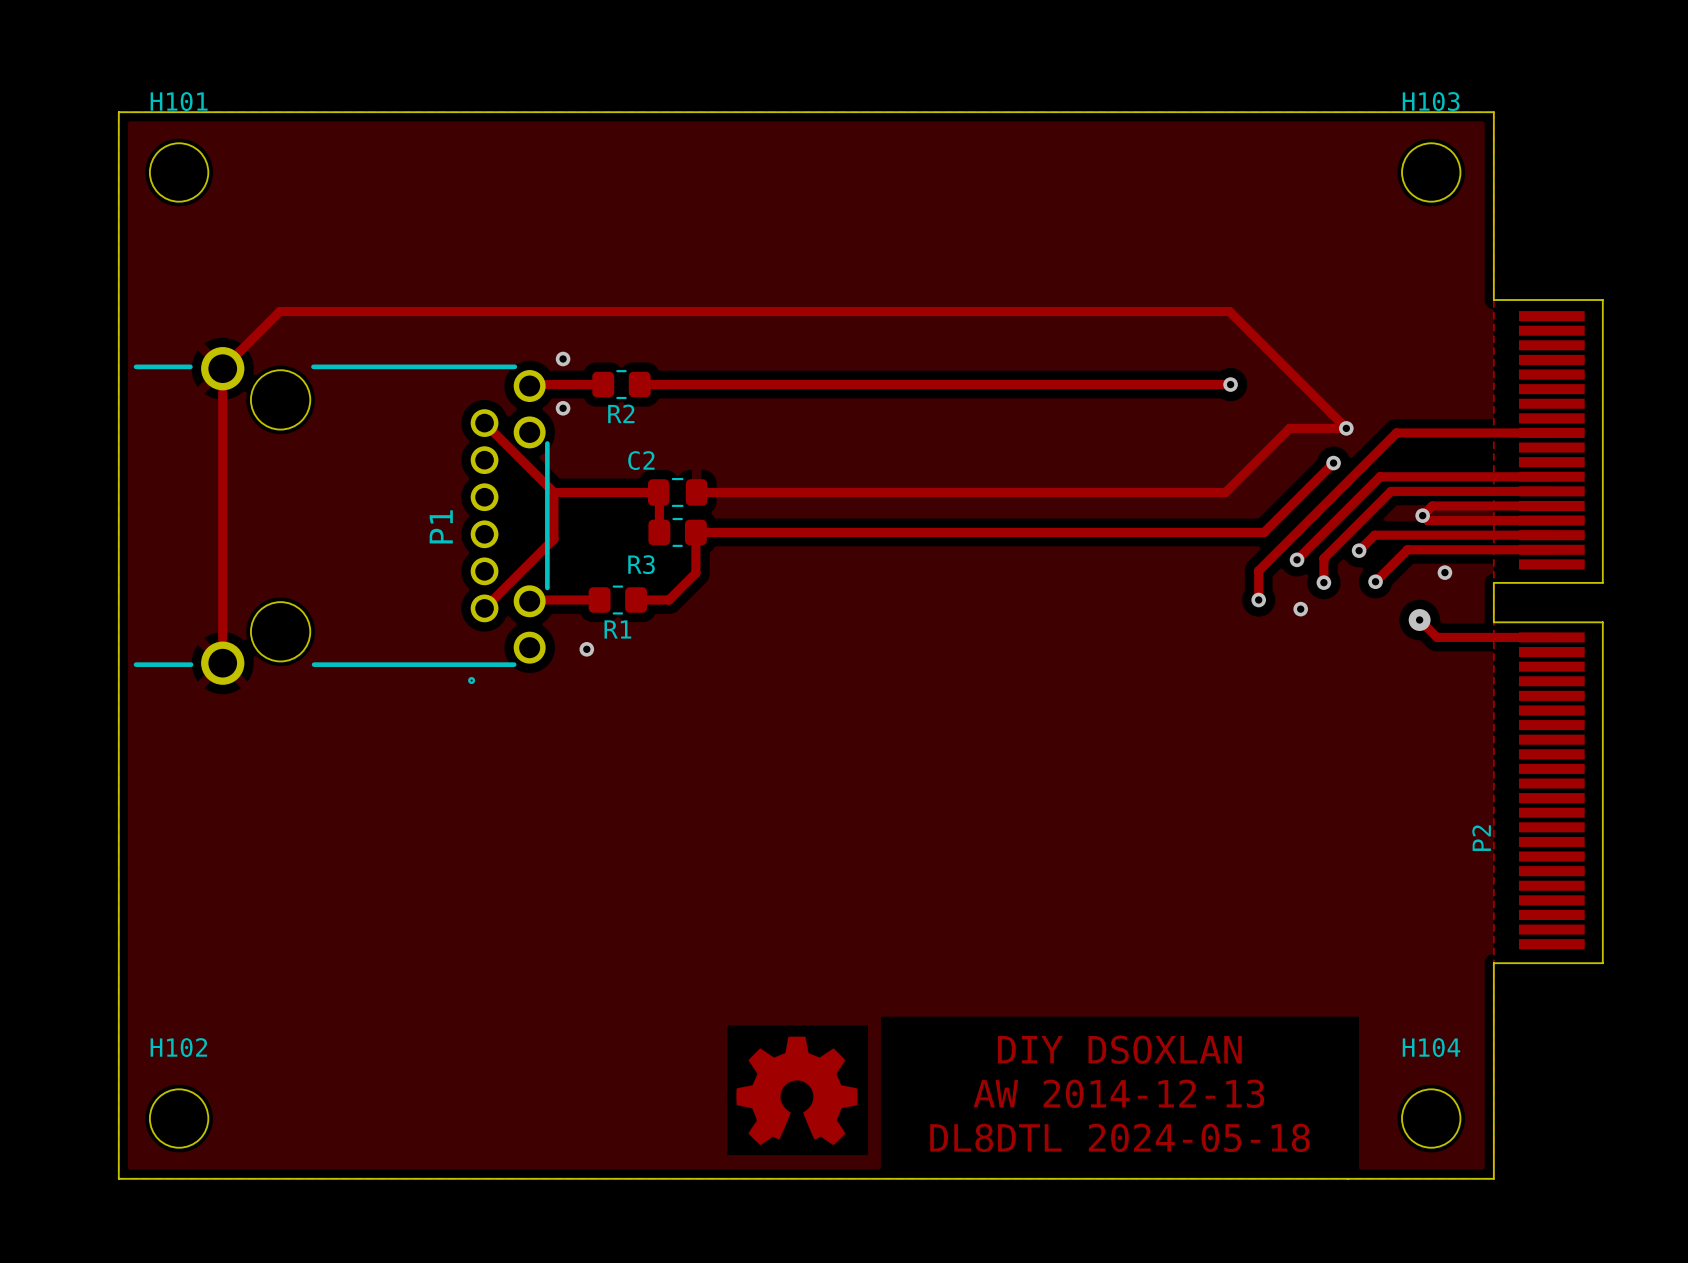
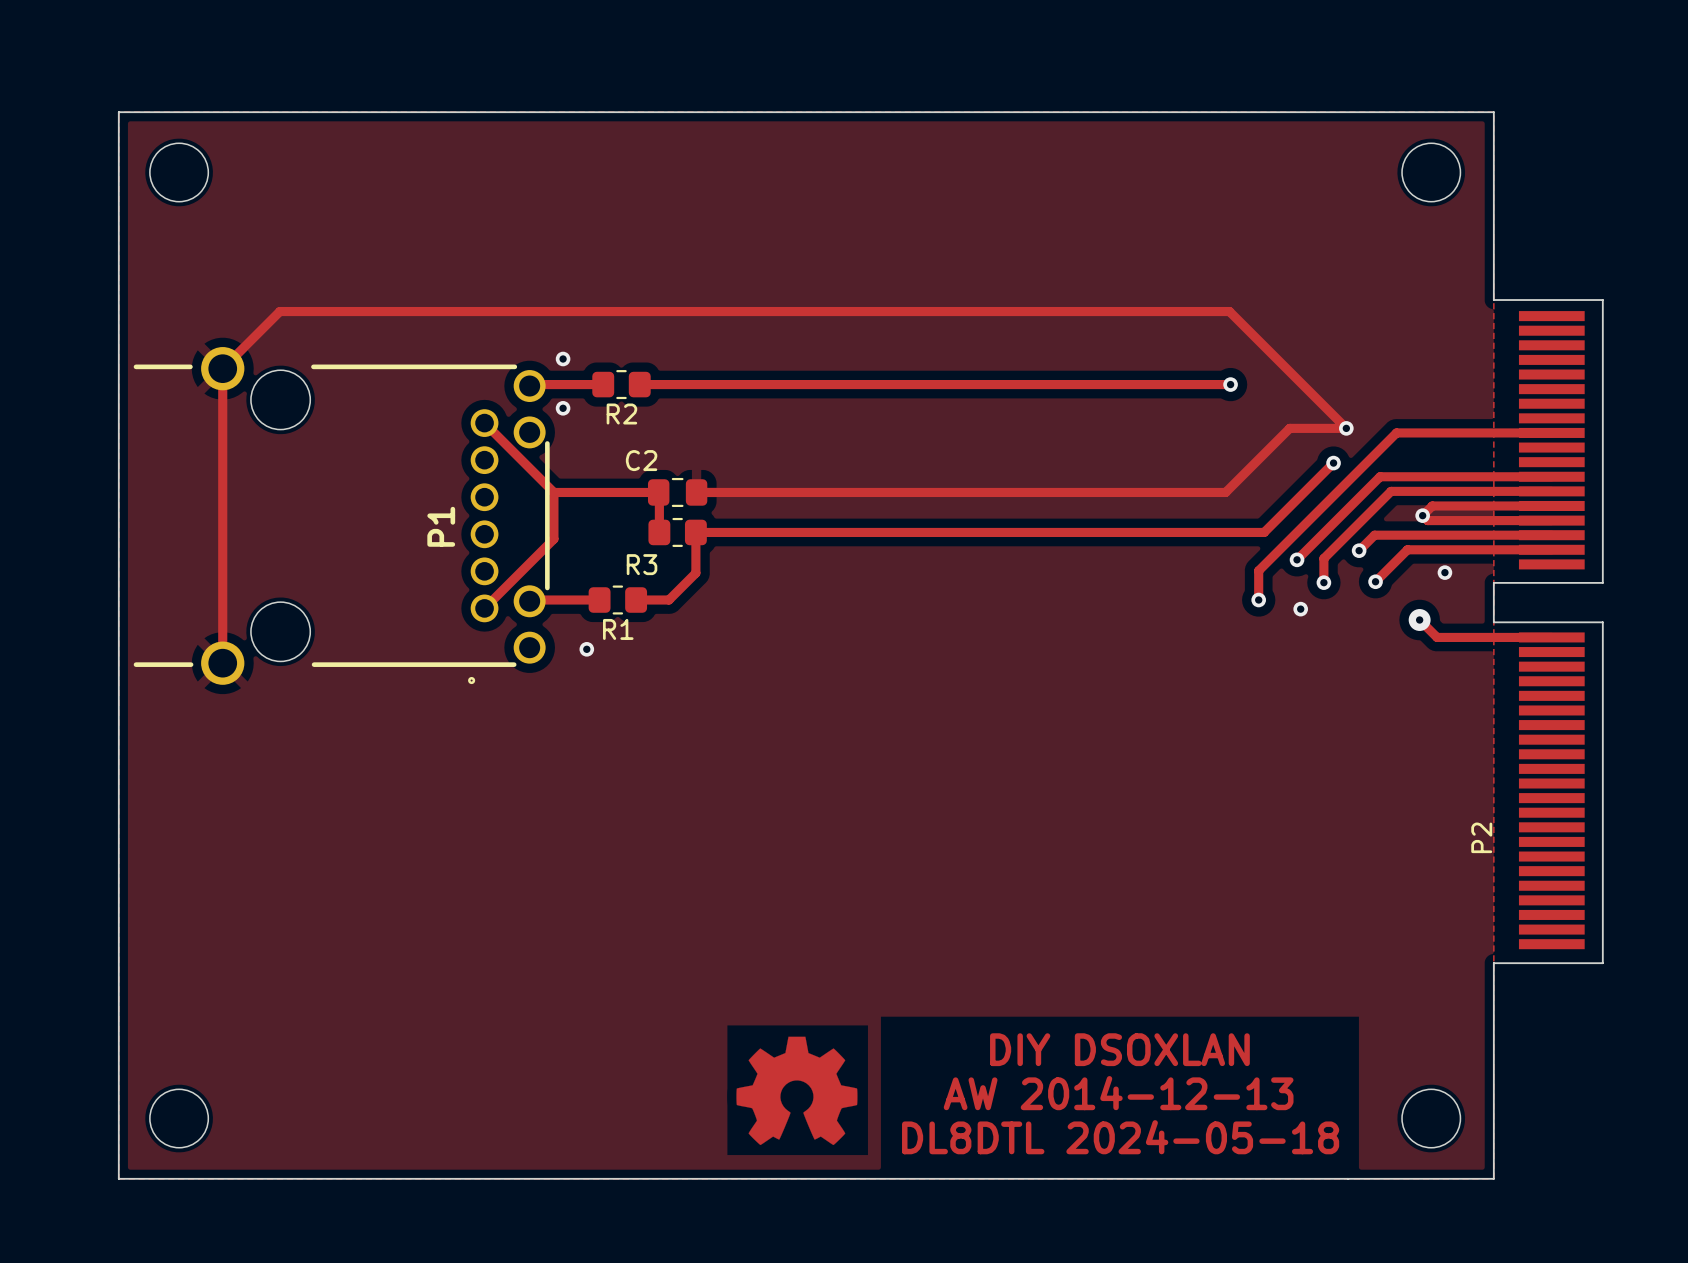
H101 name: H101 (179, 101) -> none
H103 name: H103 (1431, 101) -> none
H102 name: H102 (178, 1047) -> none
H104 name: H104 (1431, 1047) -> none

